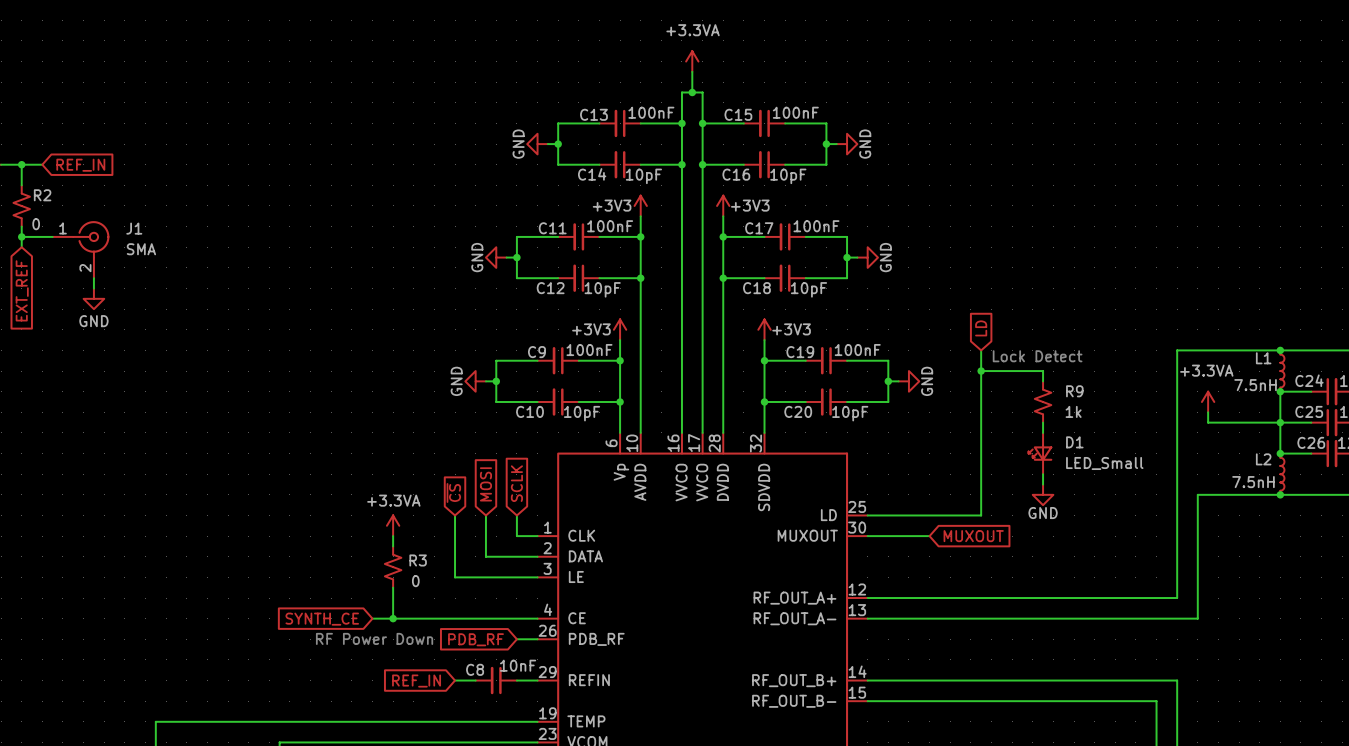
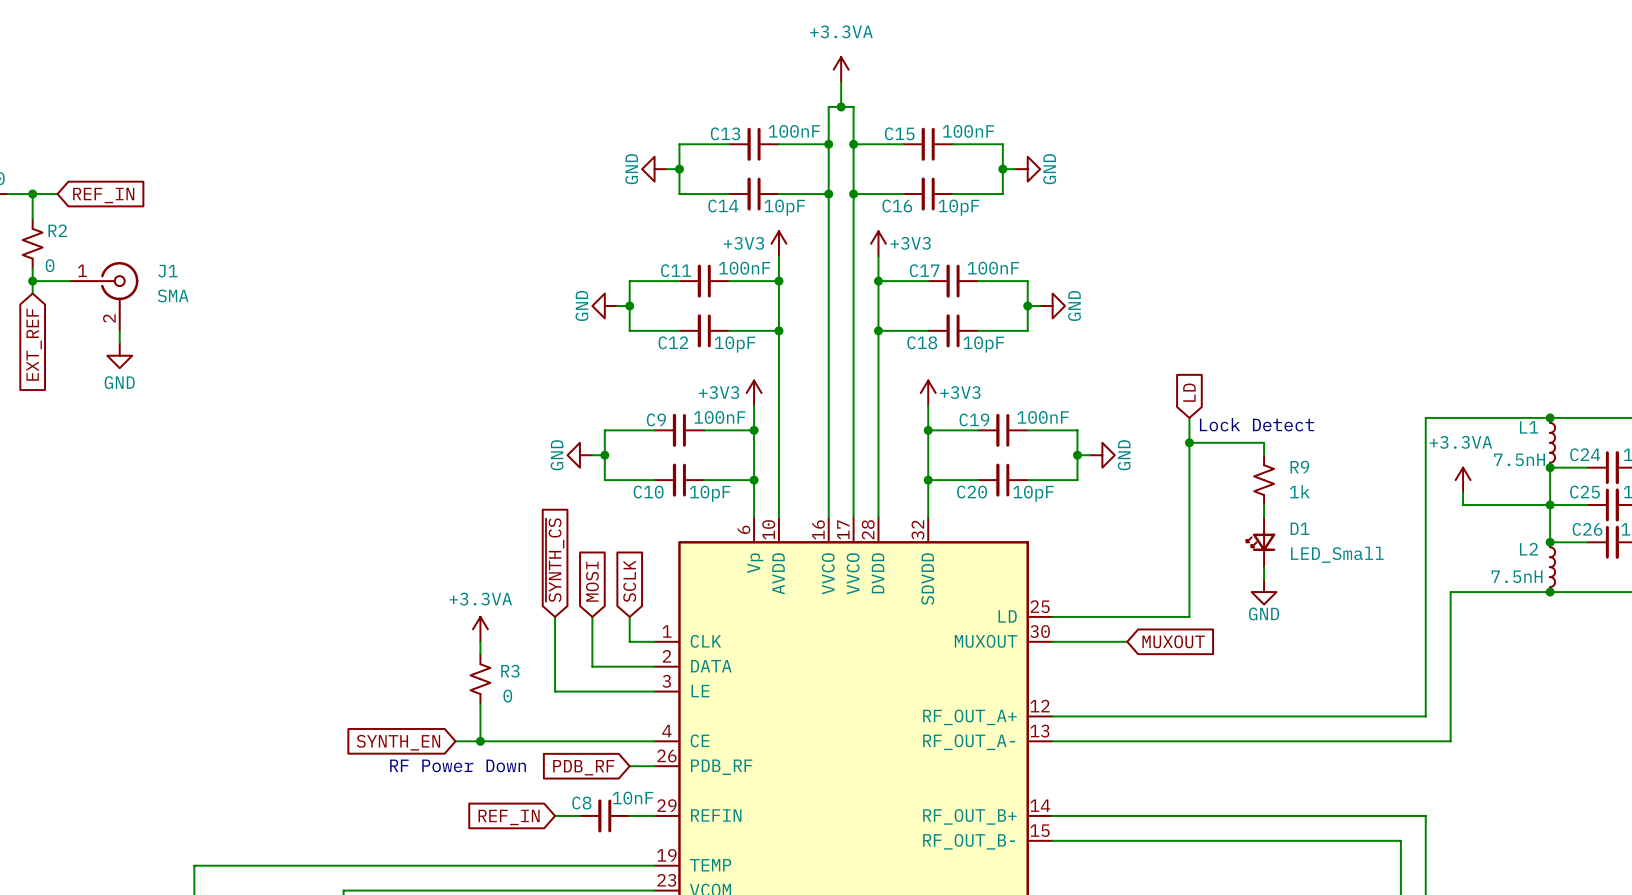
global label: ~{CS} (453, 492) -> ~{SYNTH_CS} (555, 560)
global label: SYNTH_CE (322, 619) -> SYNTH_EN (398, 742)

